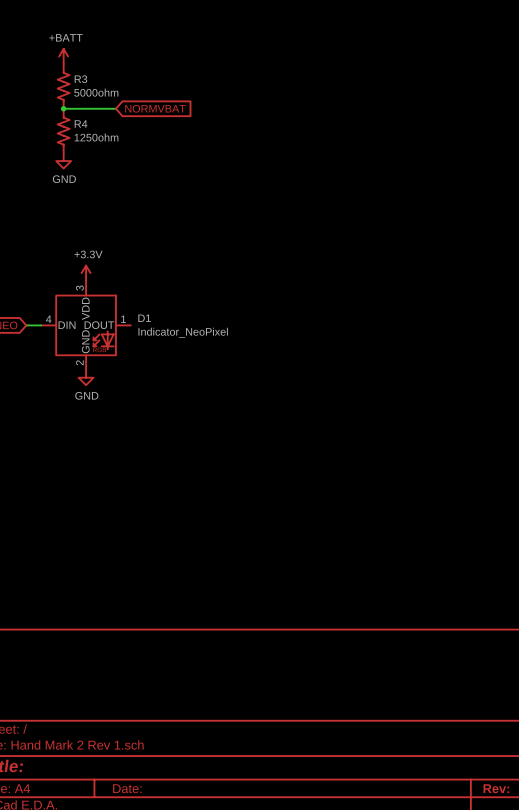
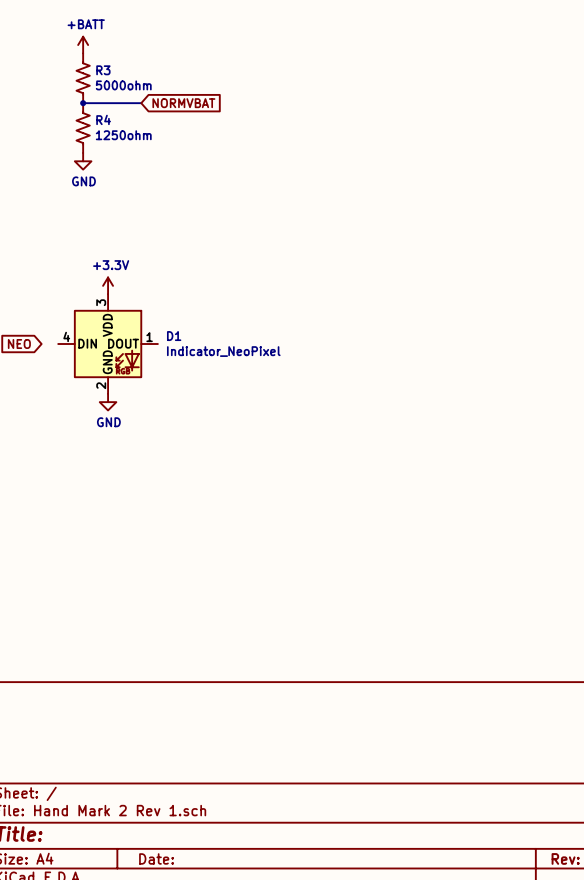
wire: (26, 325) (41, 325) -> none

